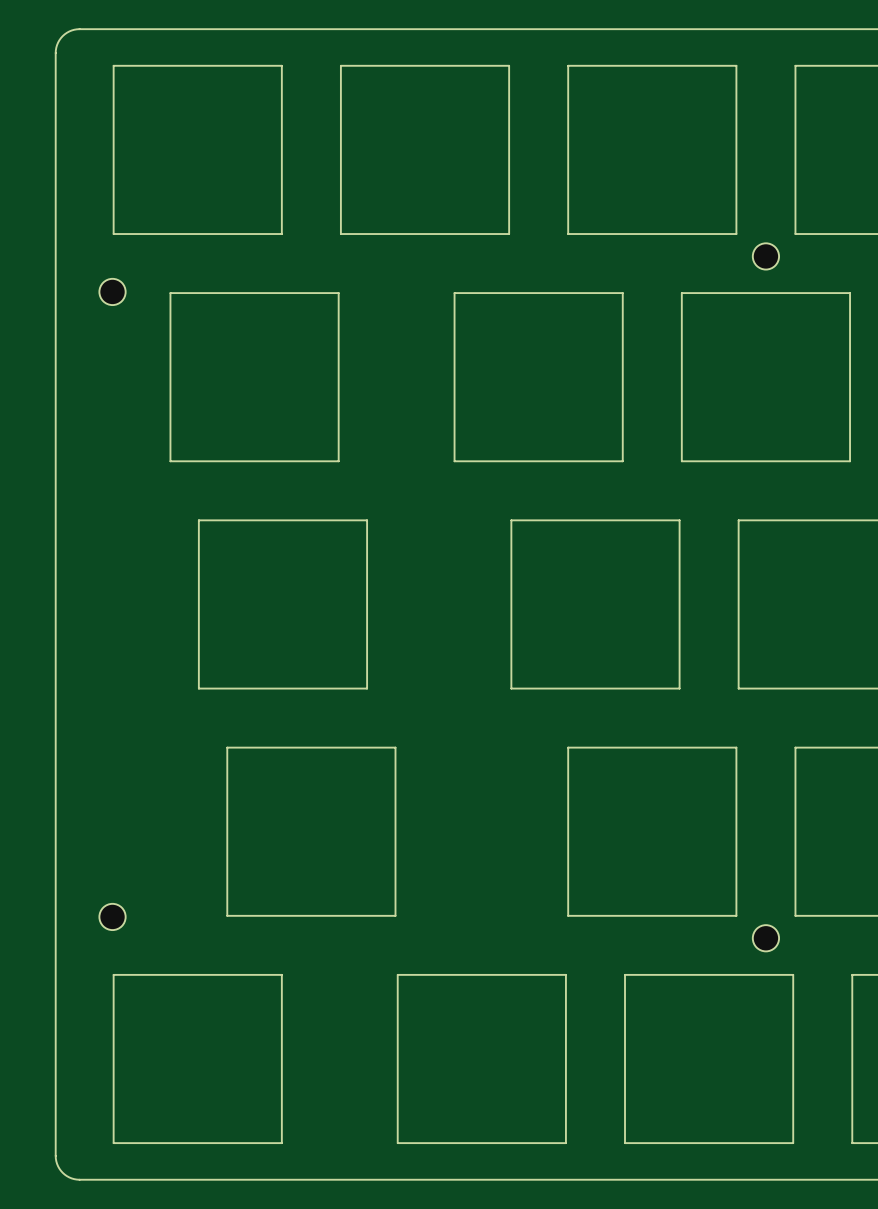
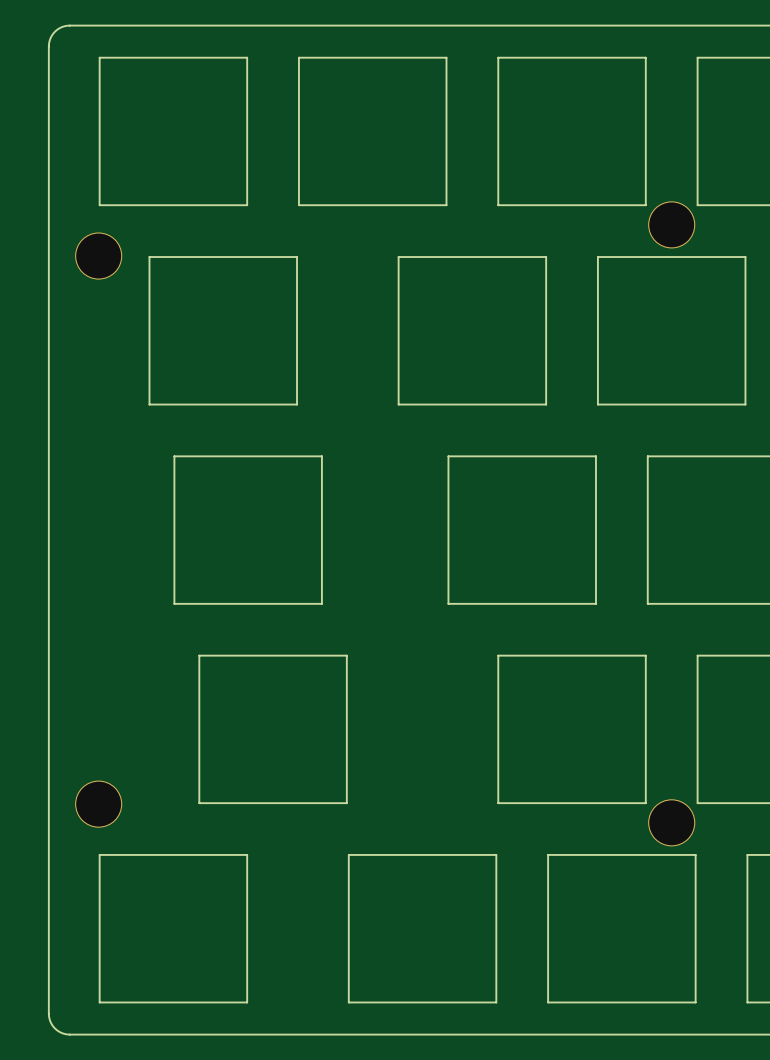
part footprint: [752, 243, 780, 270] -> [648, 201, 696, 249]
part footprint: [99, 278, 126, 306] -> [75, 232, 123, 280]
part footprint: [99, 903, 126, 931] -> [75, 780, 123, 828]
part footprint: [752, 925, 780, 952] -> [648, 799, 696, 847]

